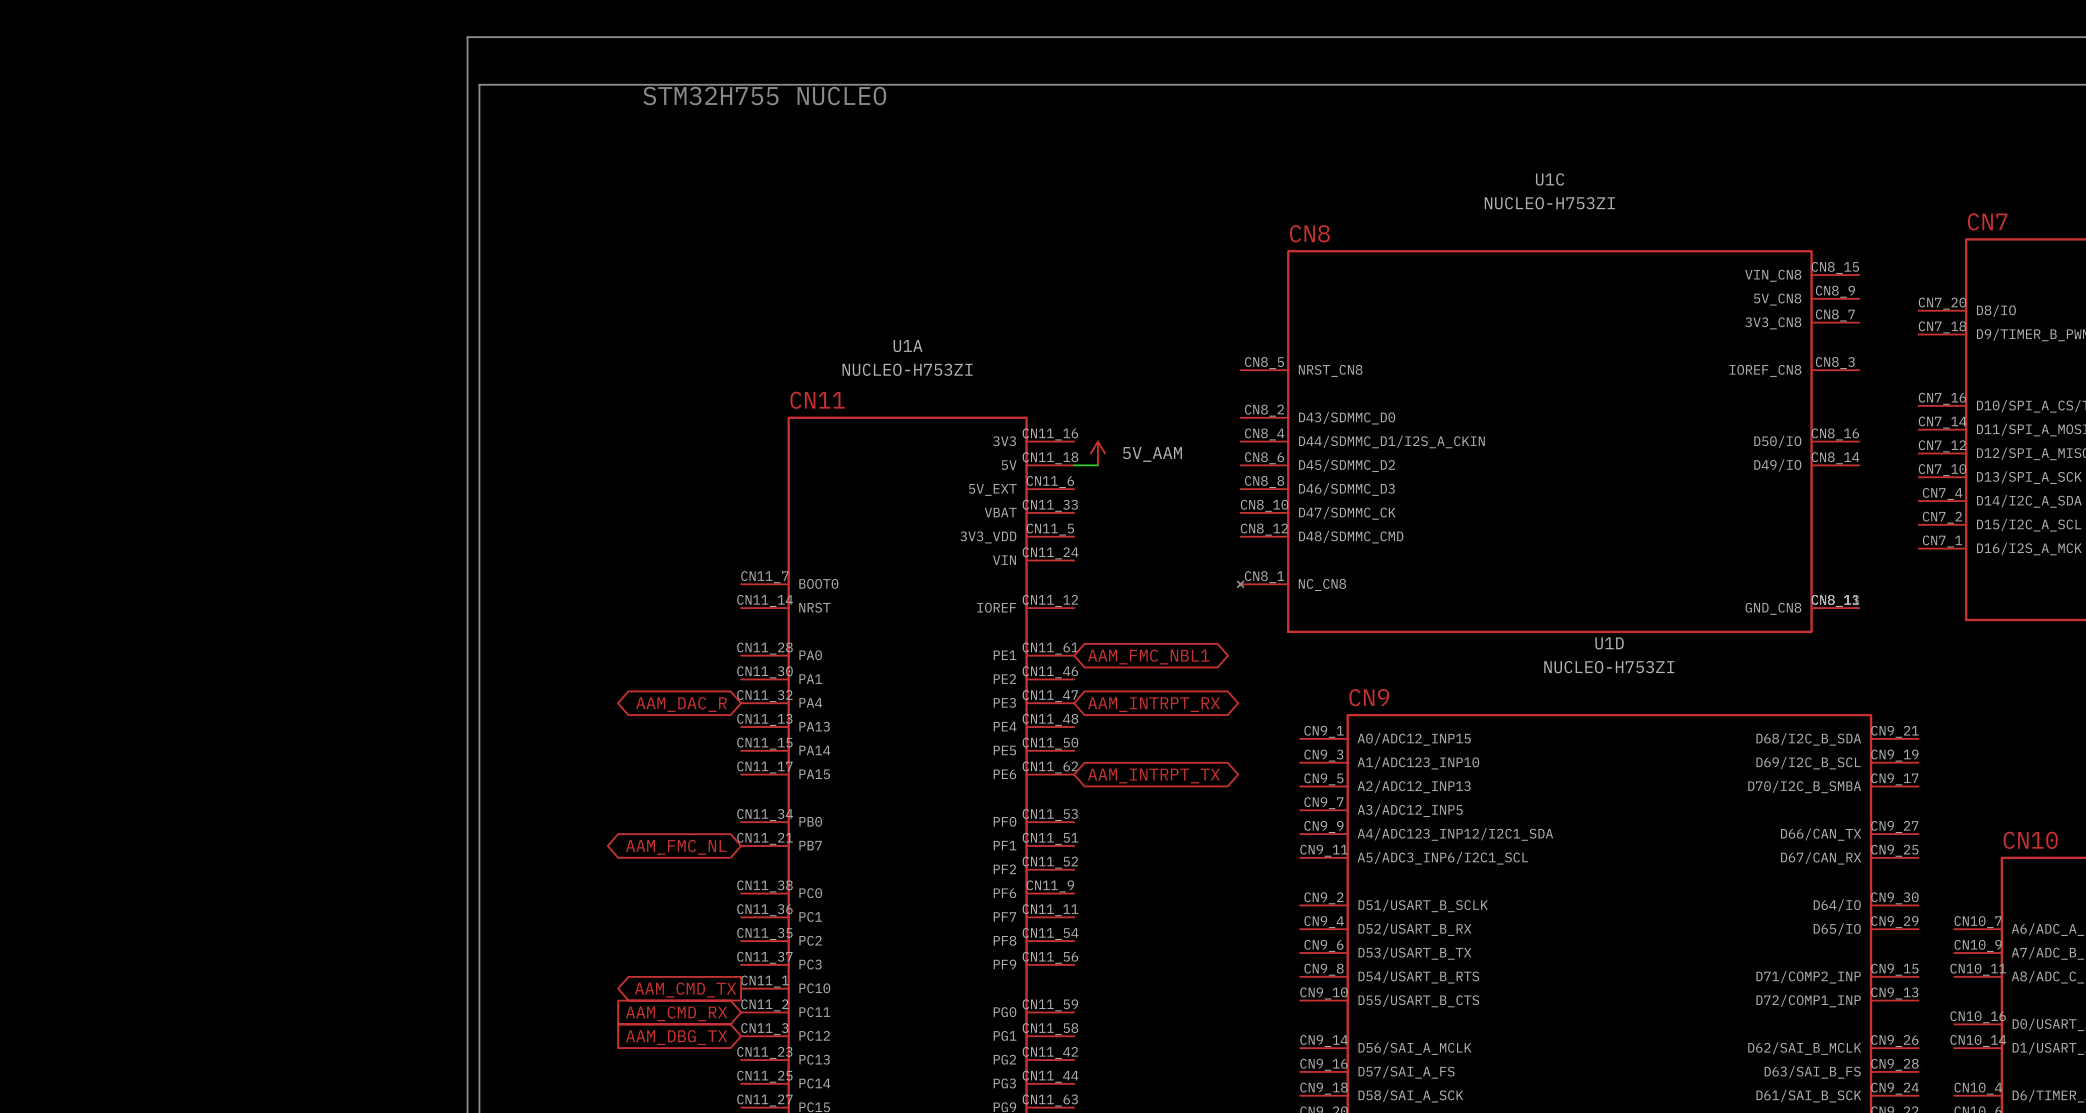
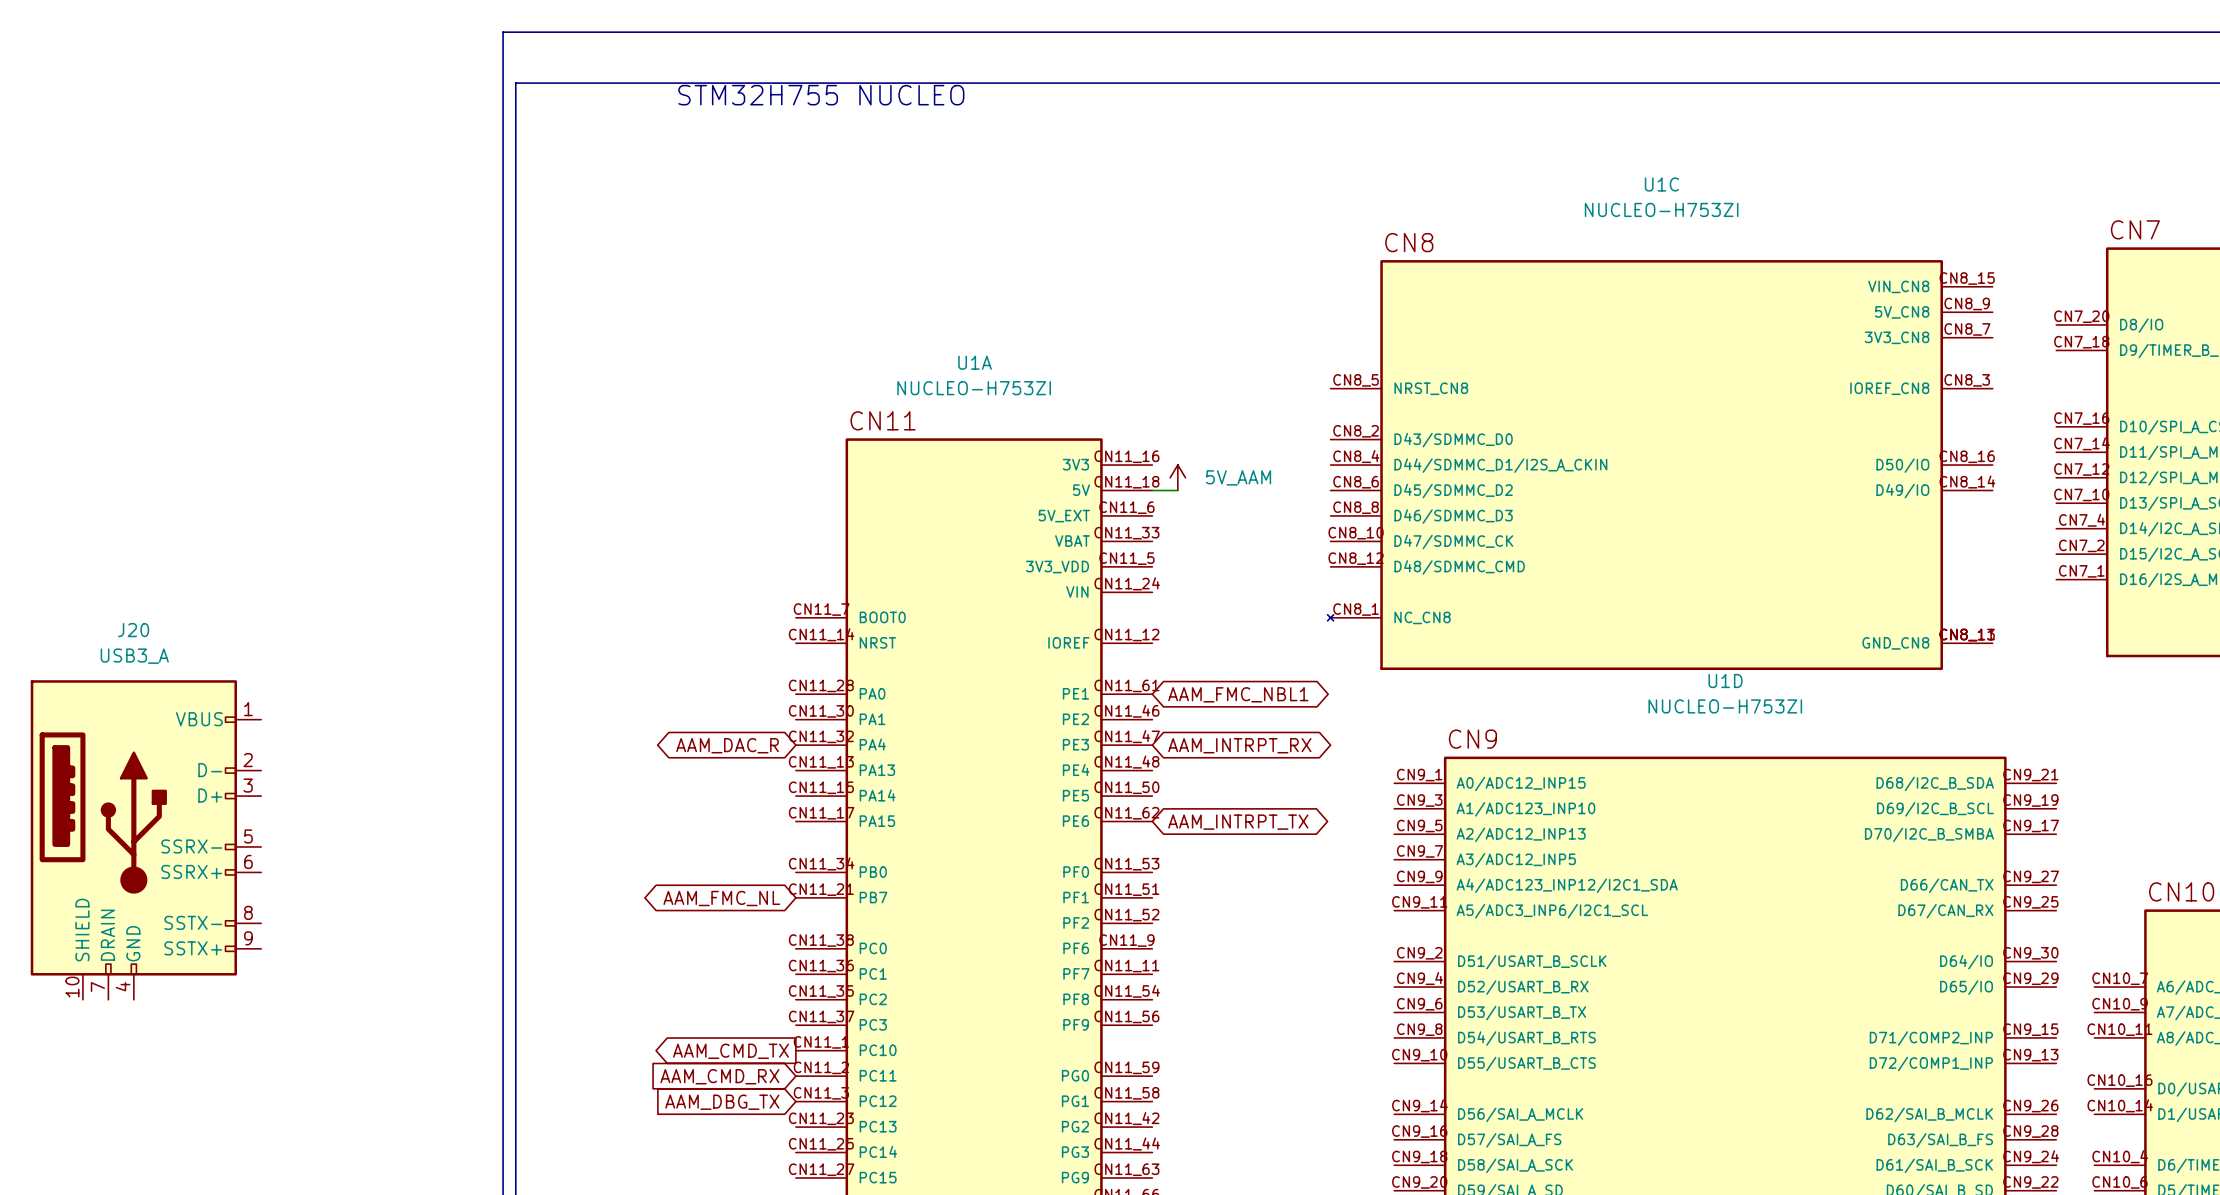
J20: none -> USB3_A (145, 839)

